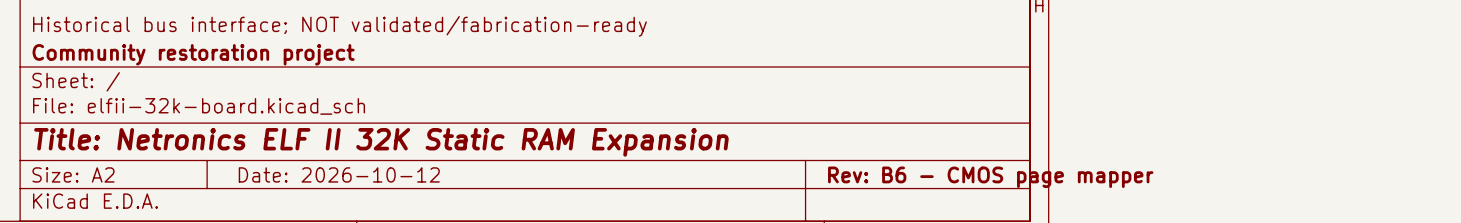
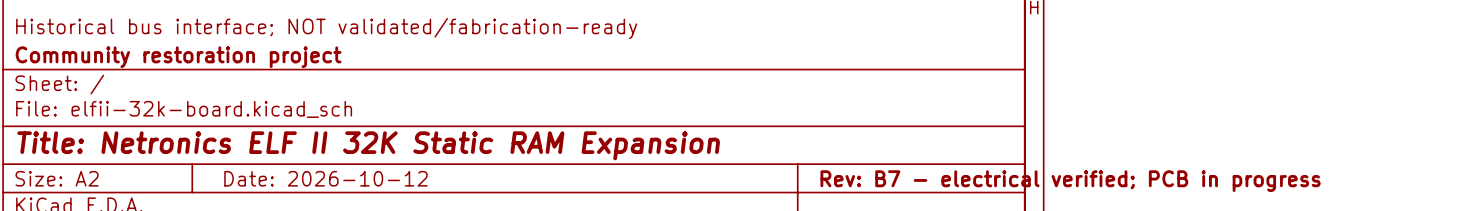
title block: Rev: B6 - CMOS page mapper (990, 177) -> Rev: B7 - electrical verified; PCB in progress (1070, 181)

